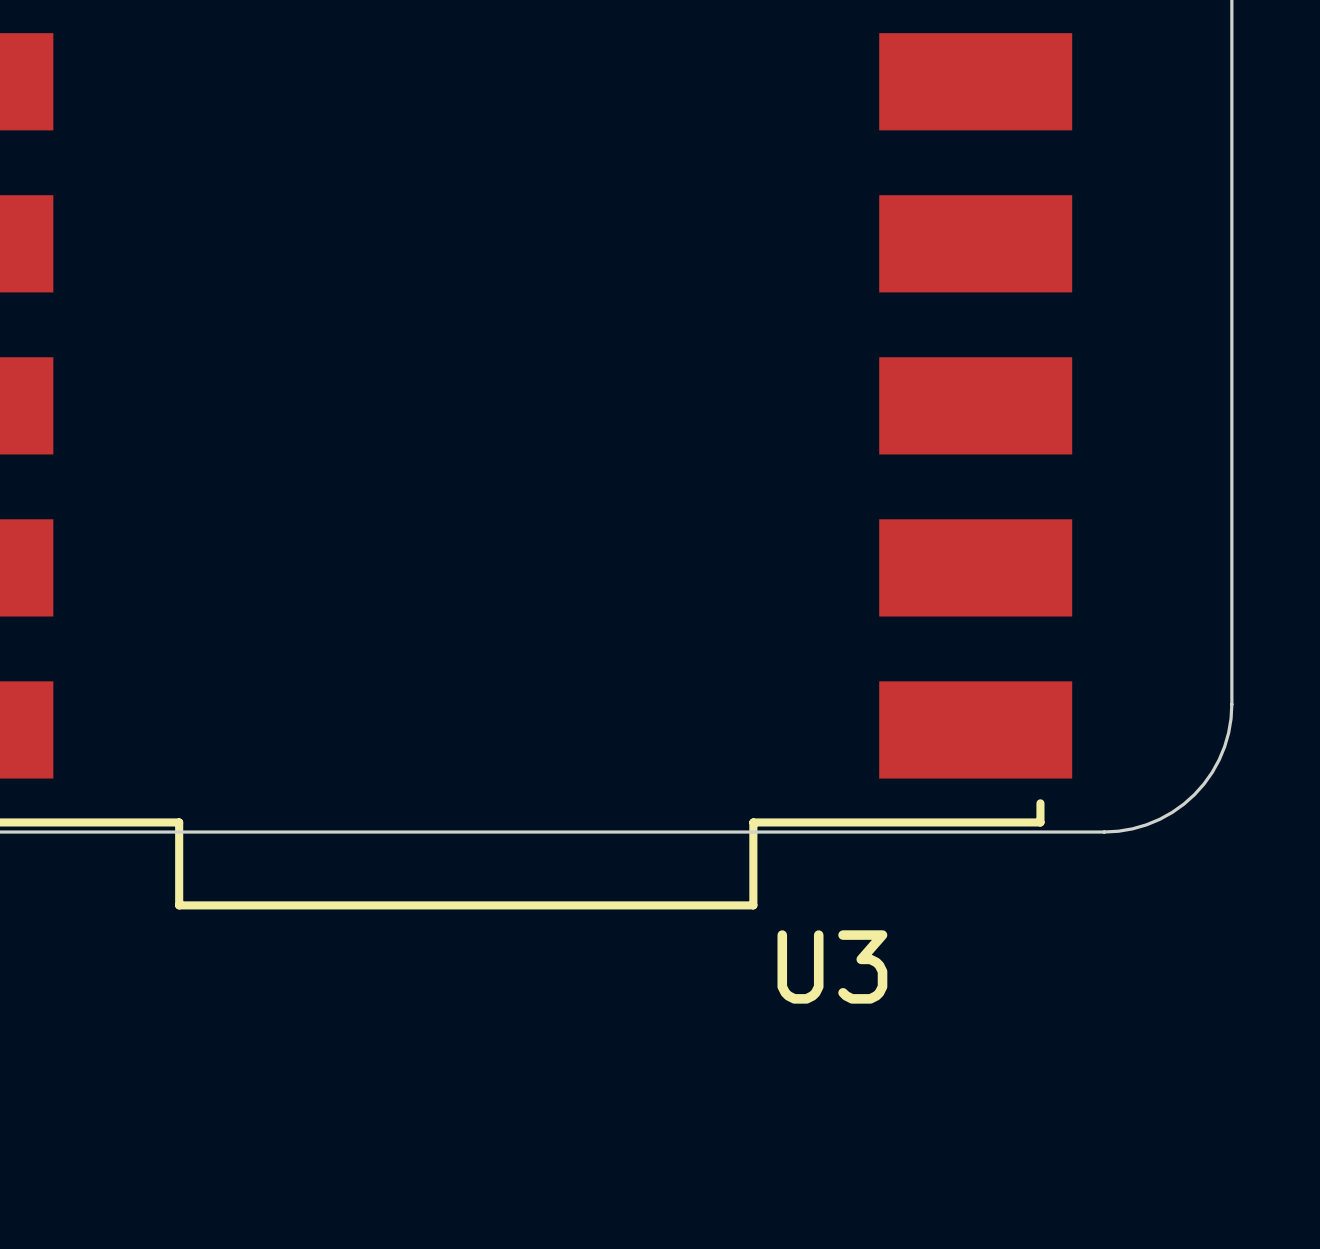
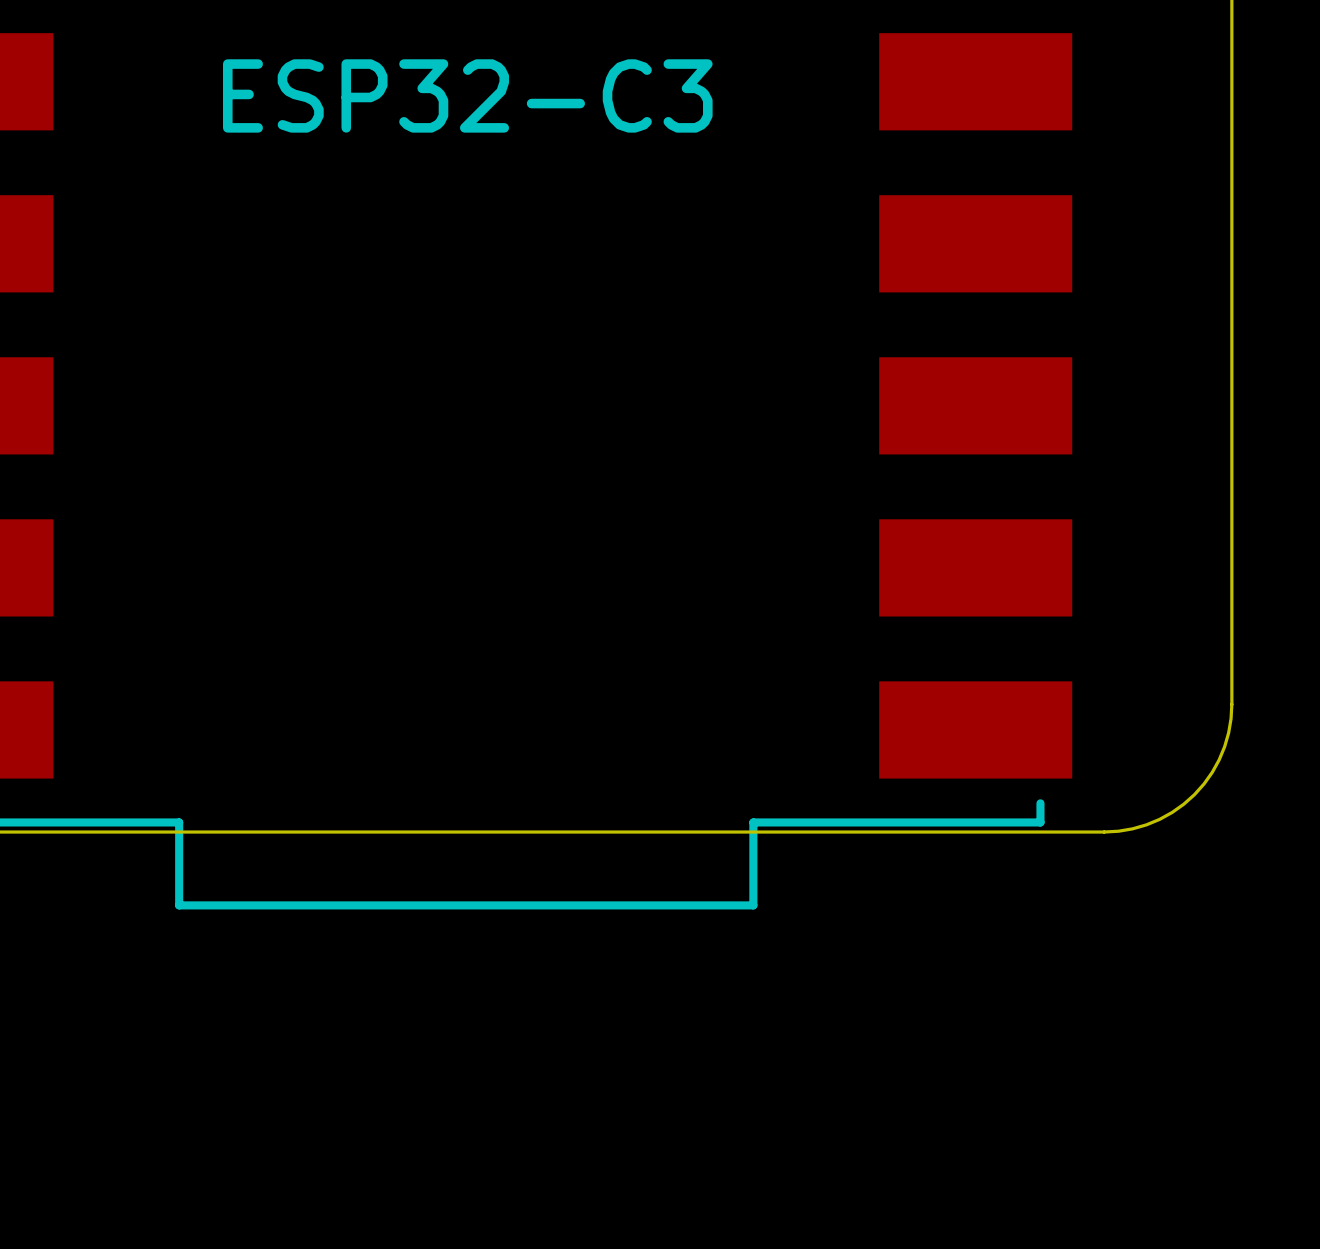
U3 name: U3 (832, 966) -> ESP32-C3 (467, 95)

